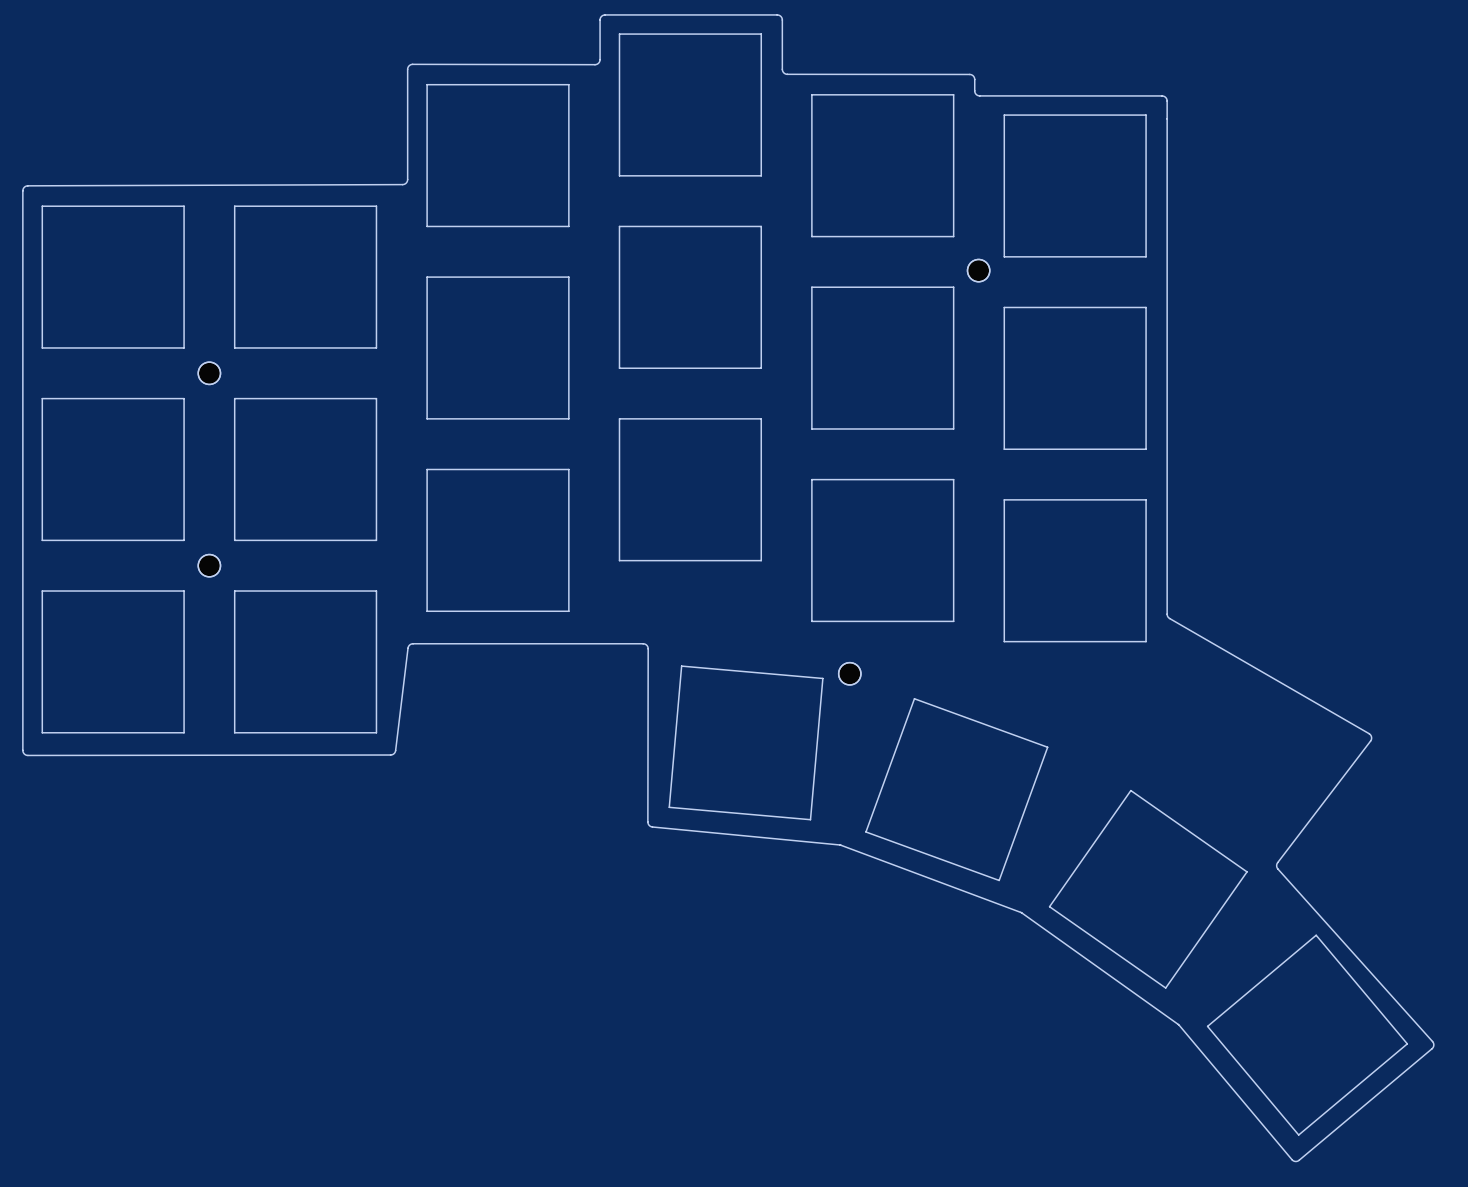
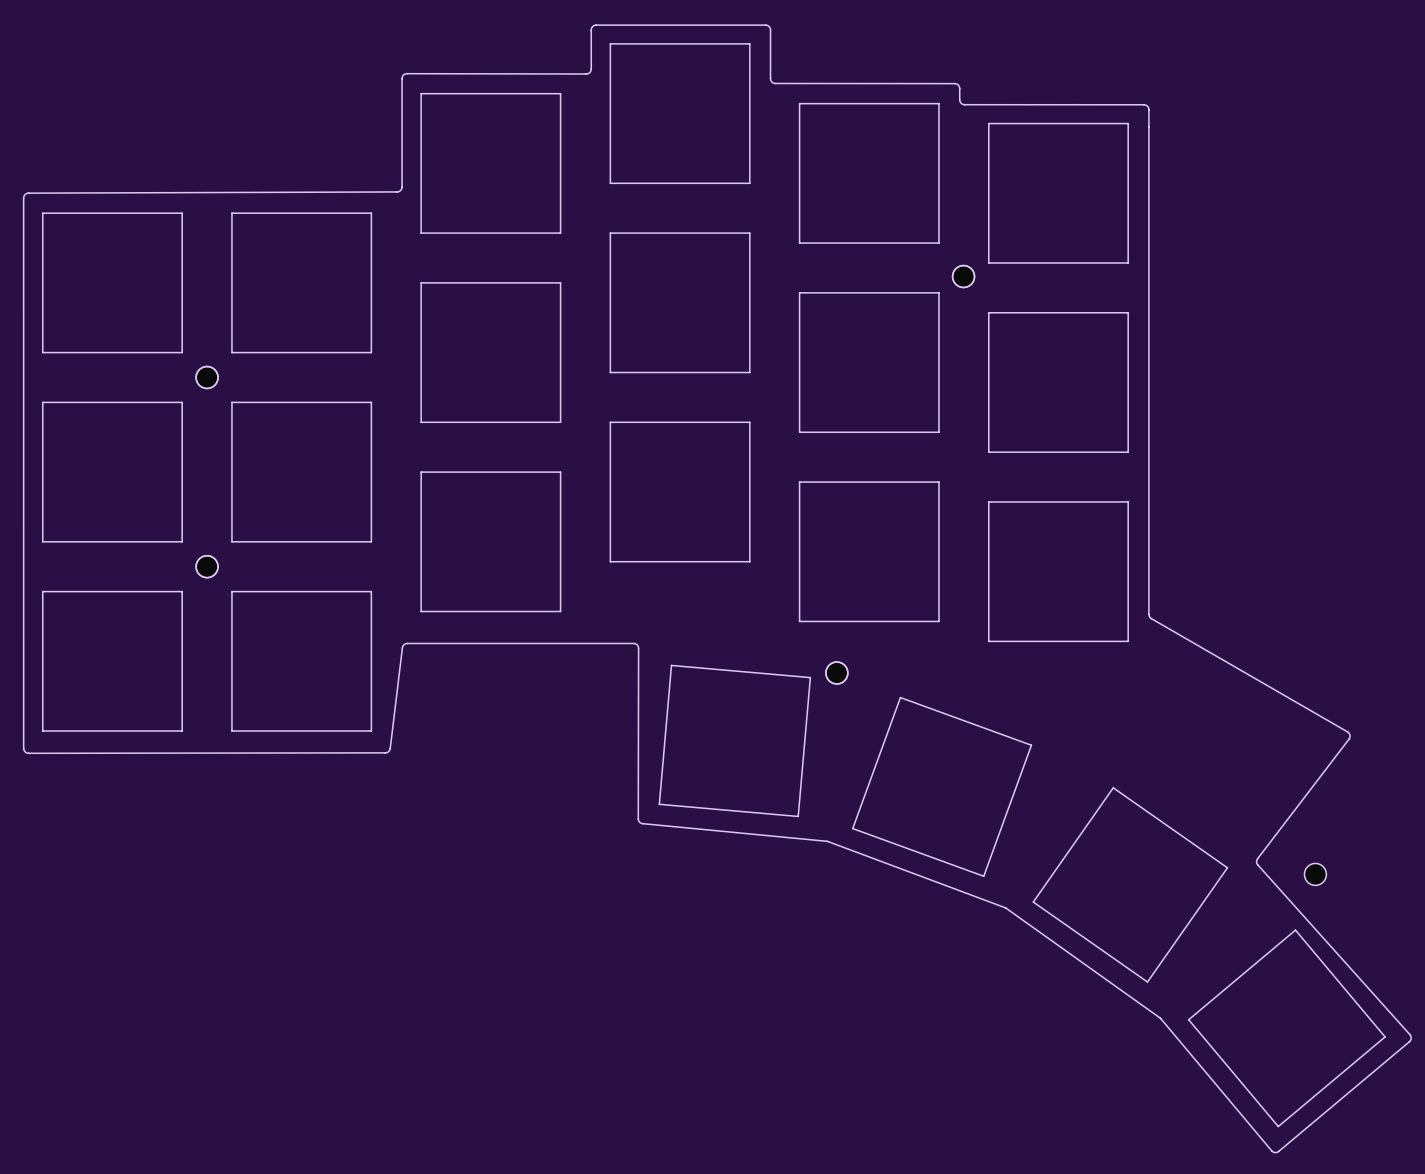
part: none -> (1315, 874)

